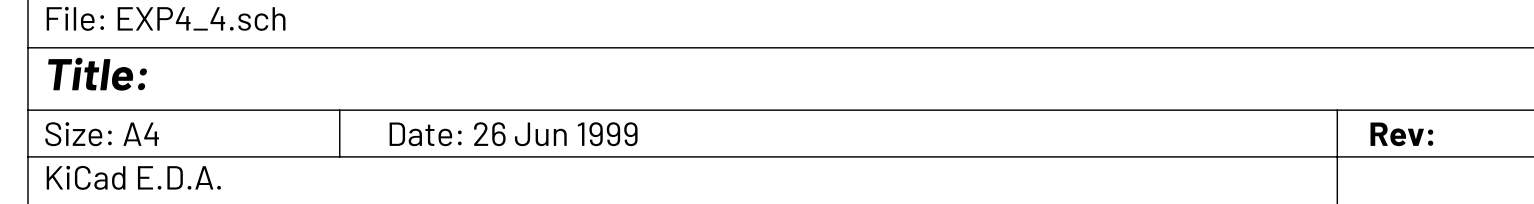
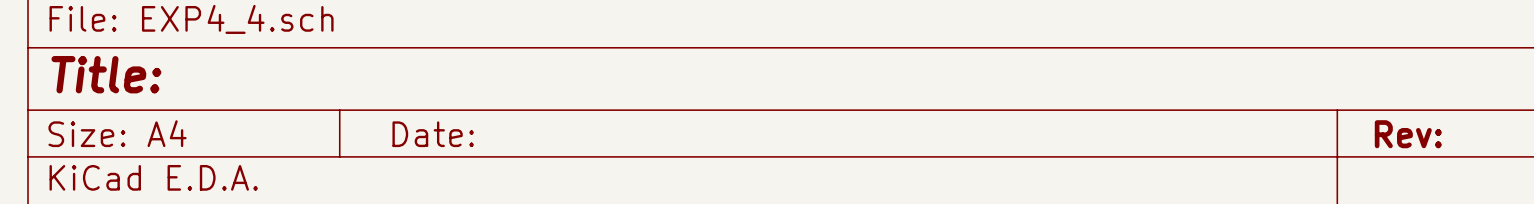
title block: Date: 26 Jun 1999 (513, 134) -> Date: (433, 134)

